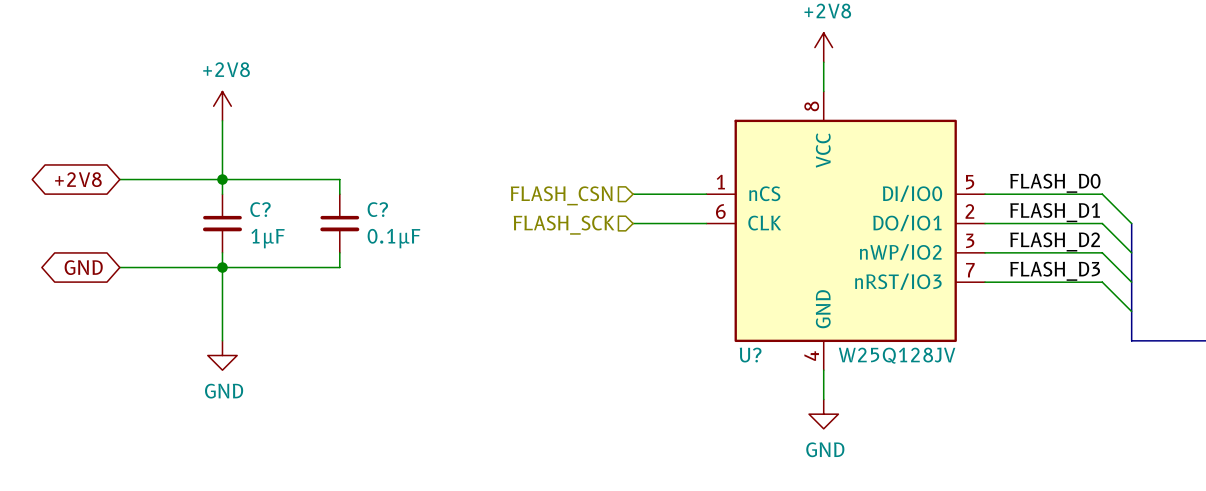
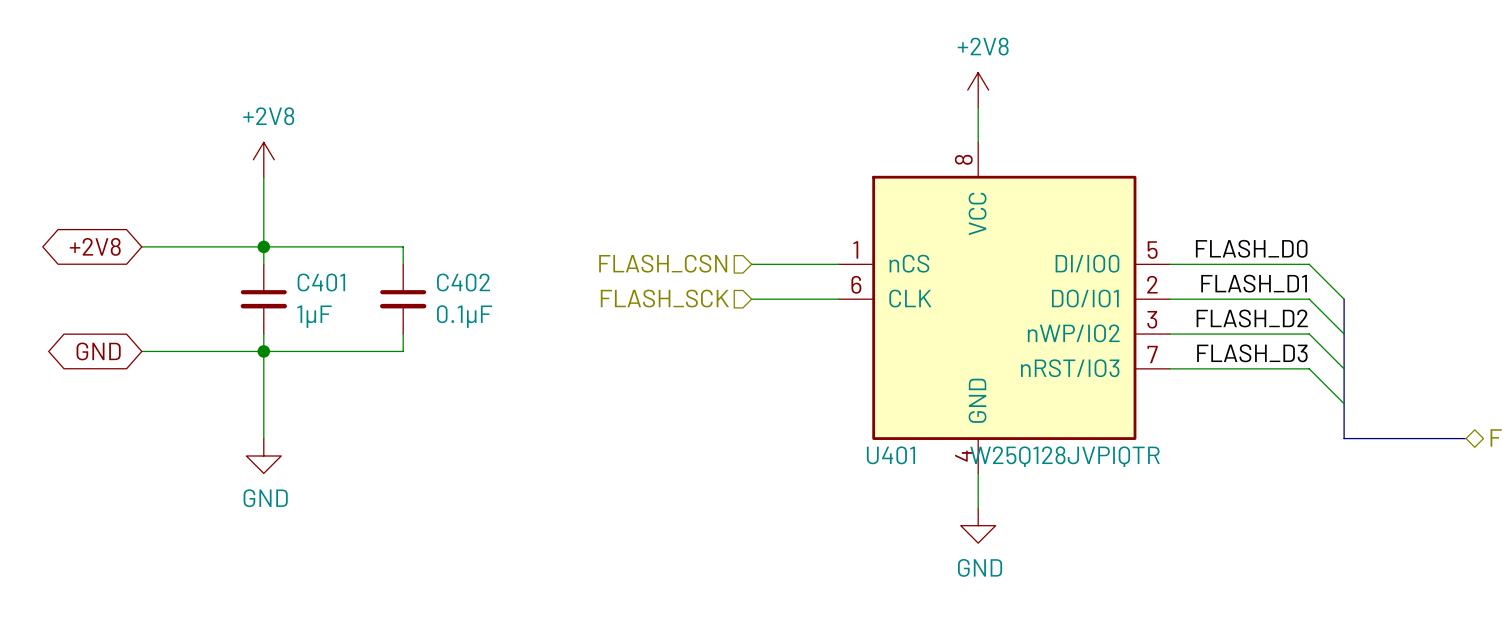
C? name: C? (260, 209) -> C401 (321, 282)
C? name: C? (377, 209) -> C402 (463, 282)
U? name: U? (750, 355) -> U401 (890, 455)
U? value: W25Q128JV (897, 355) -> W25Q128JVPIQTR (1065, 456)

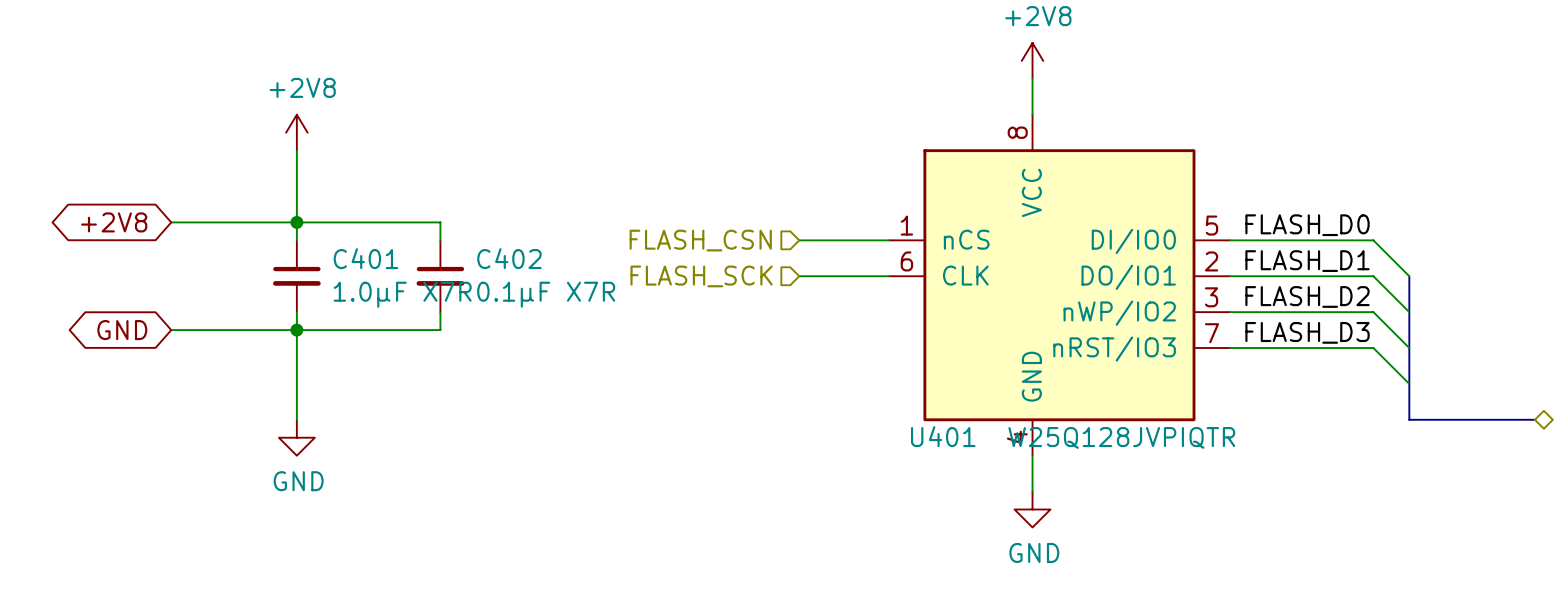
C401 value: 1µF (314, 316) -> 1.0µF X7R (402, 294)
C402 value: 0.1µF (464, 316) -> 0.1µF X7R (546, 294)

